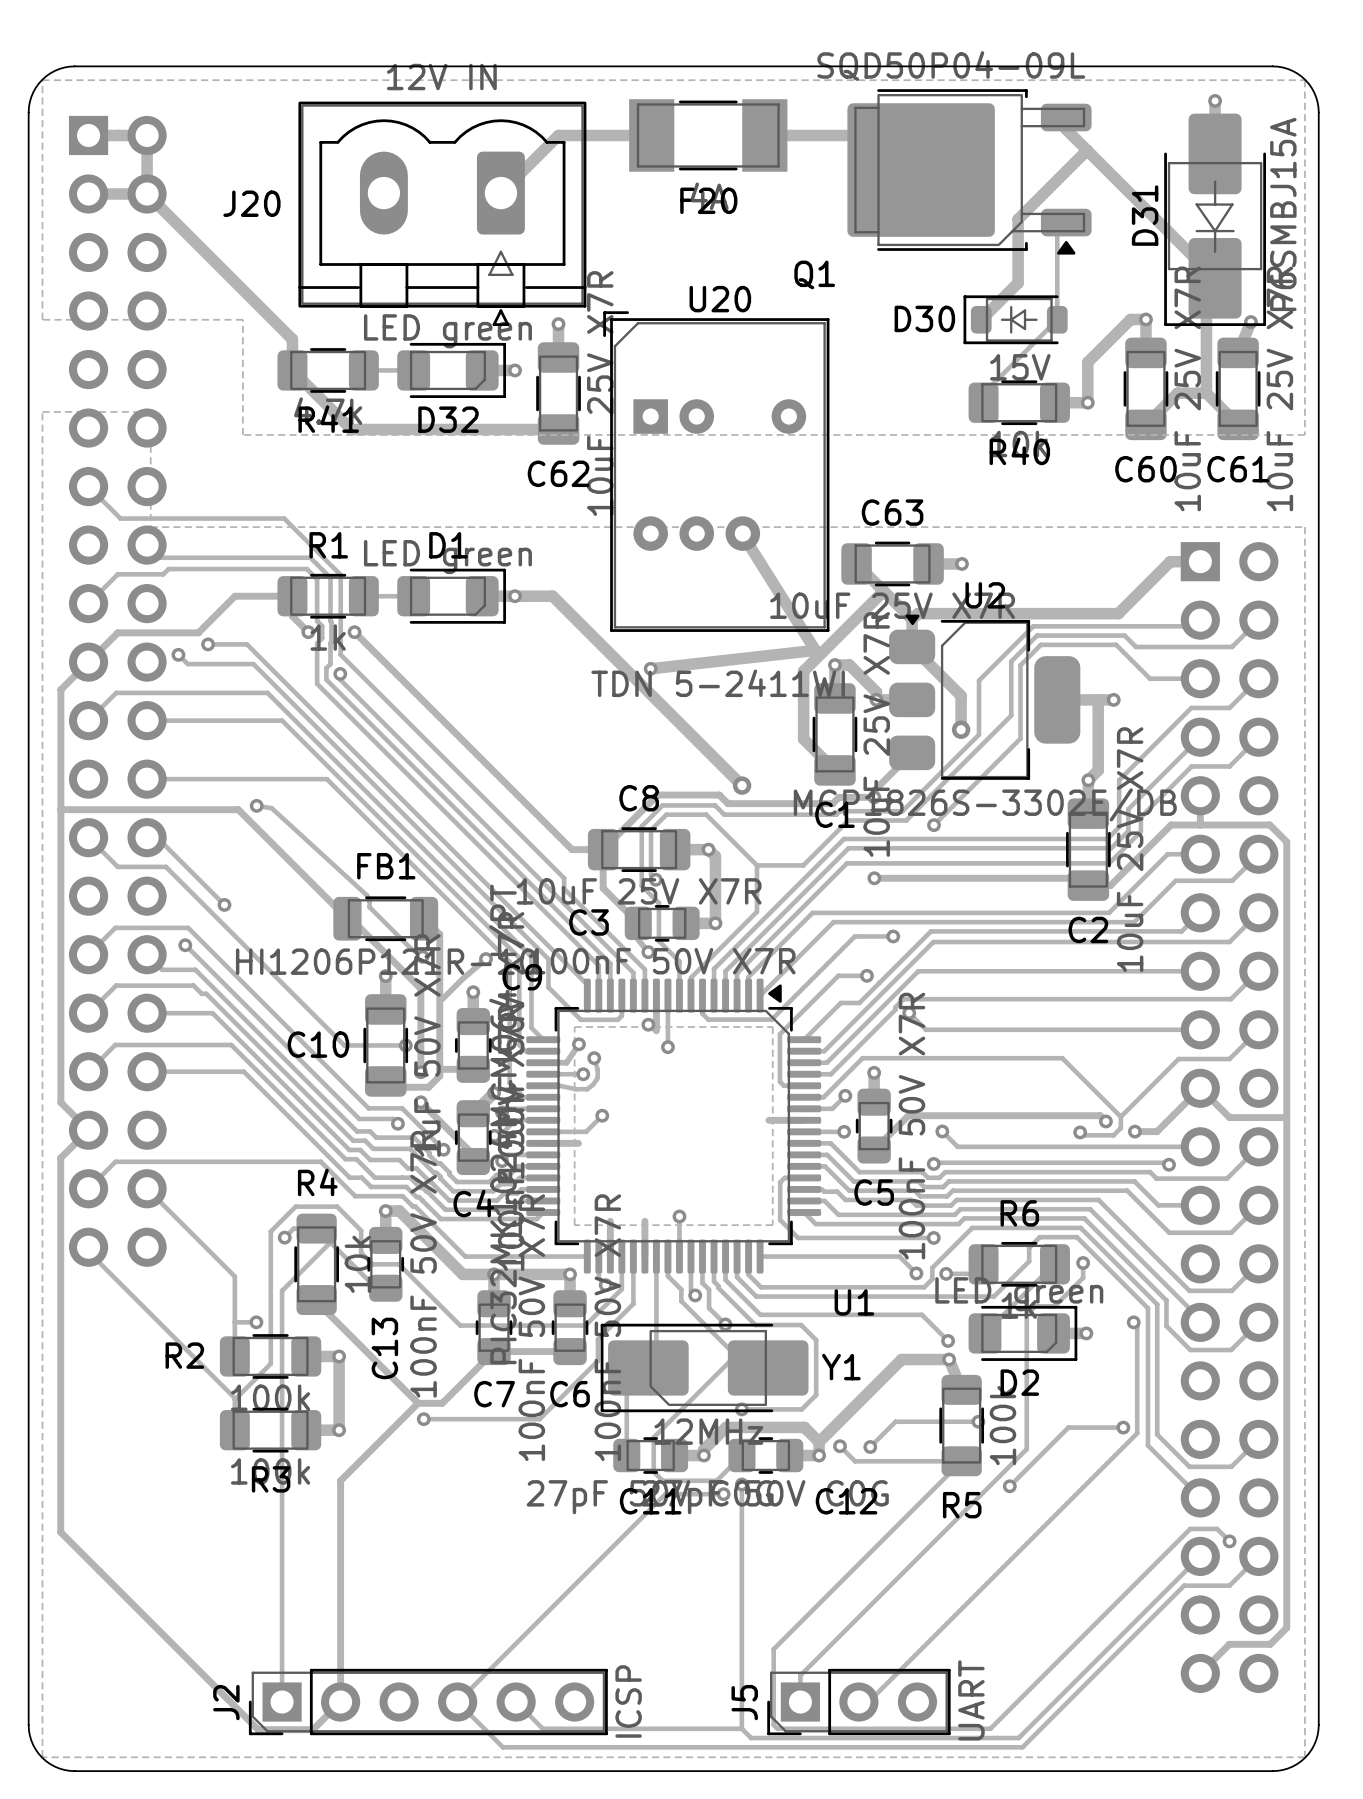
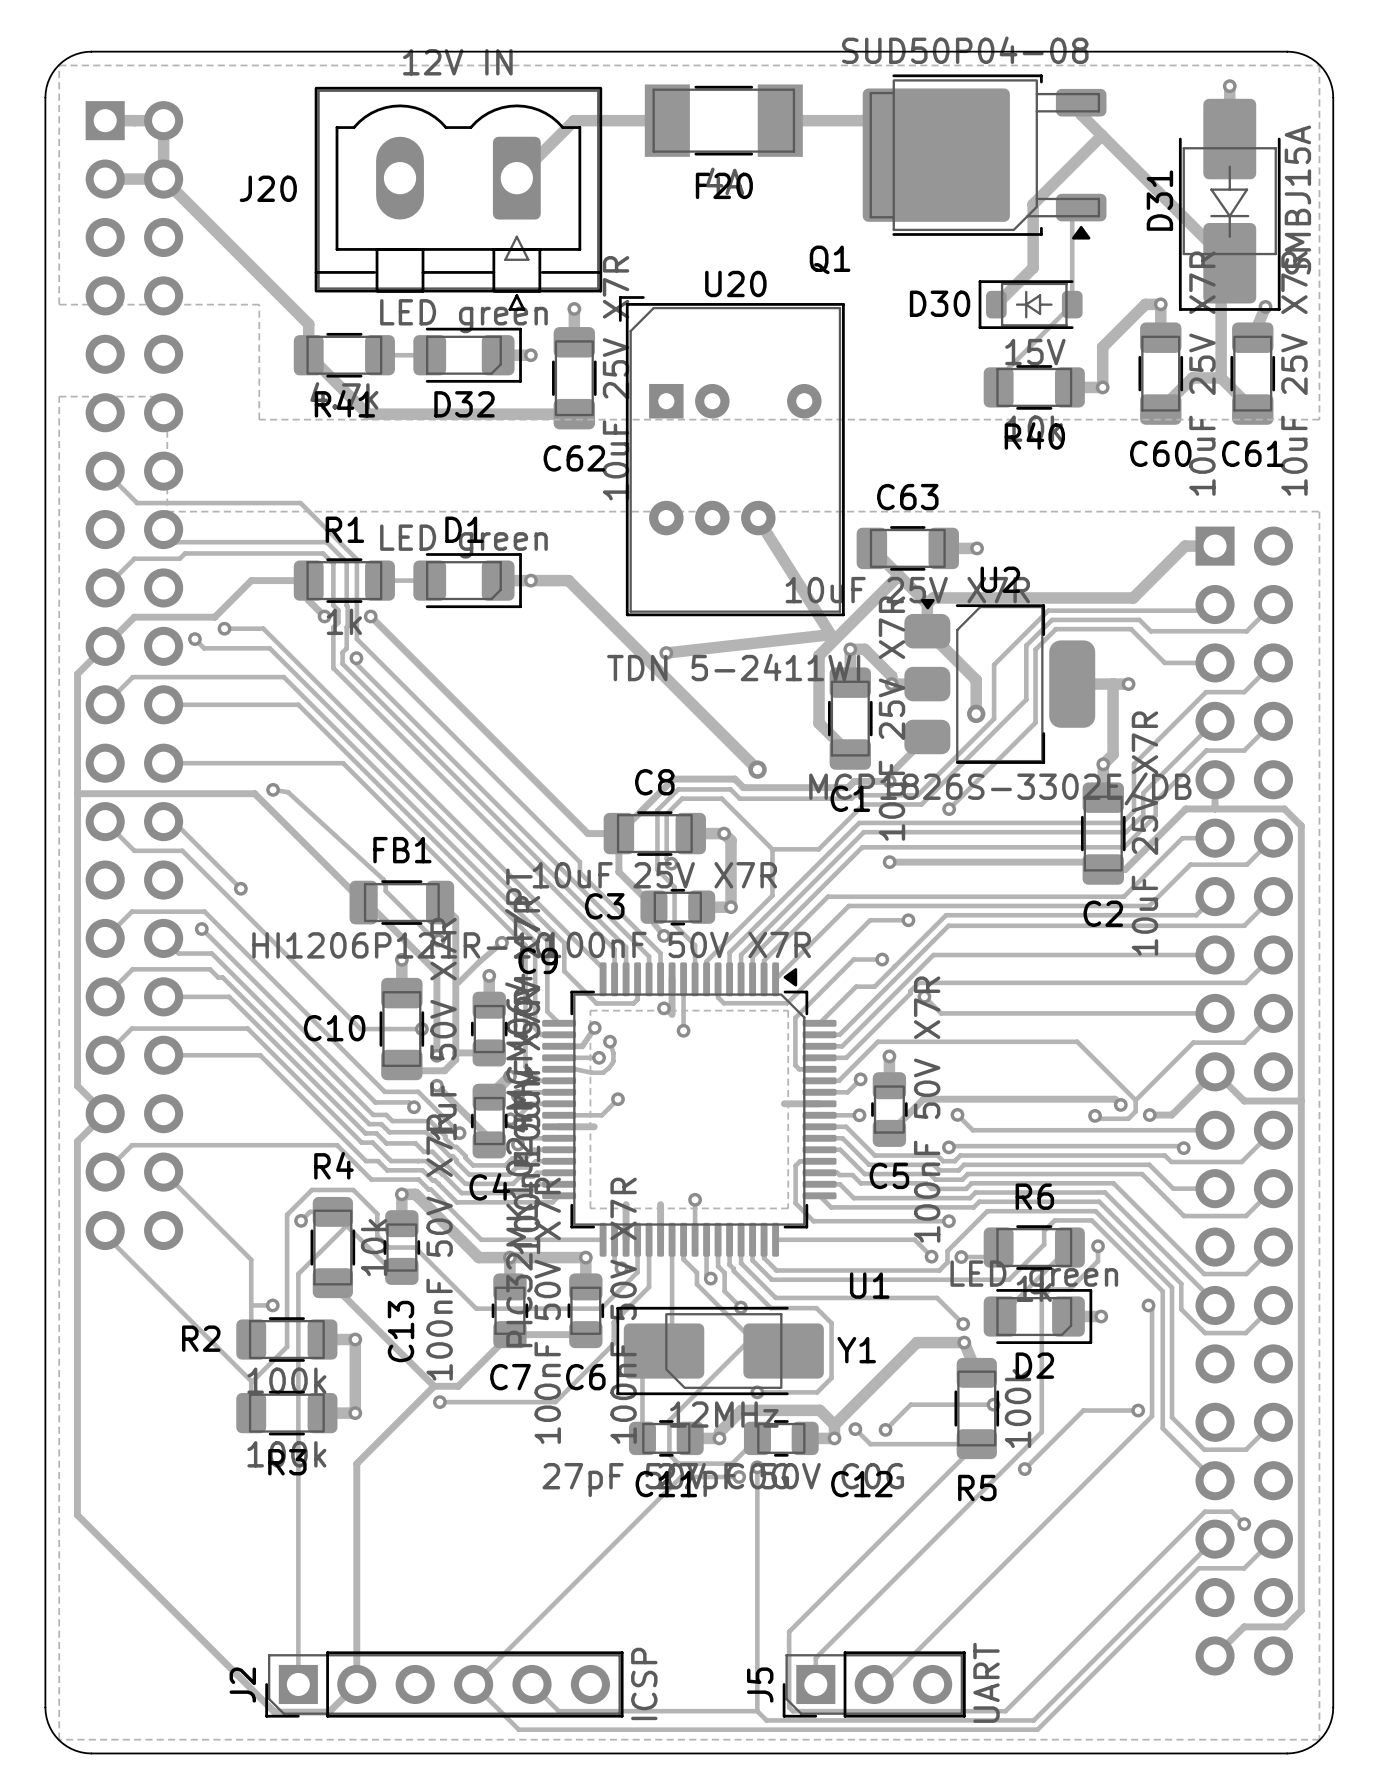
Q1 value: SQD50P04-09L (951, 66) -> SUD50P04-08 (965, 50)
D31 value: P6SMBJ15A (1283, 214) -> SMBJ15A (1297, 200)

